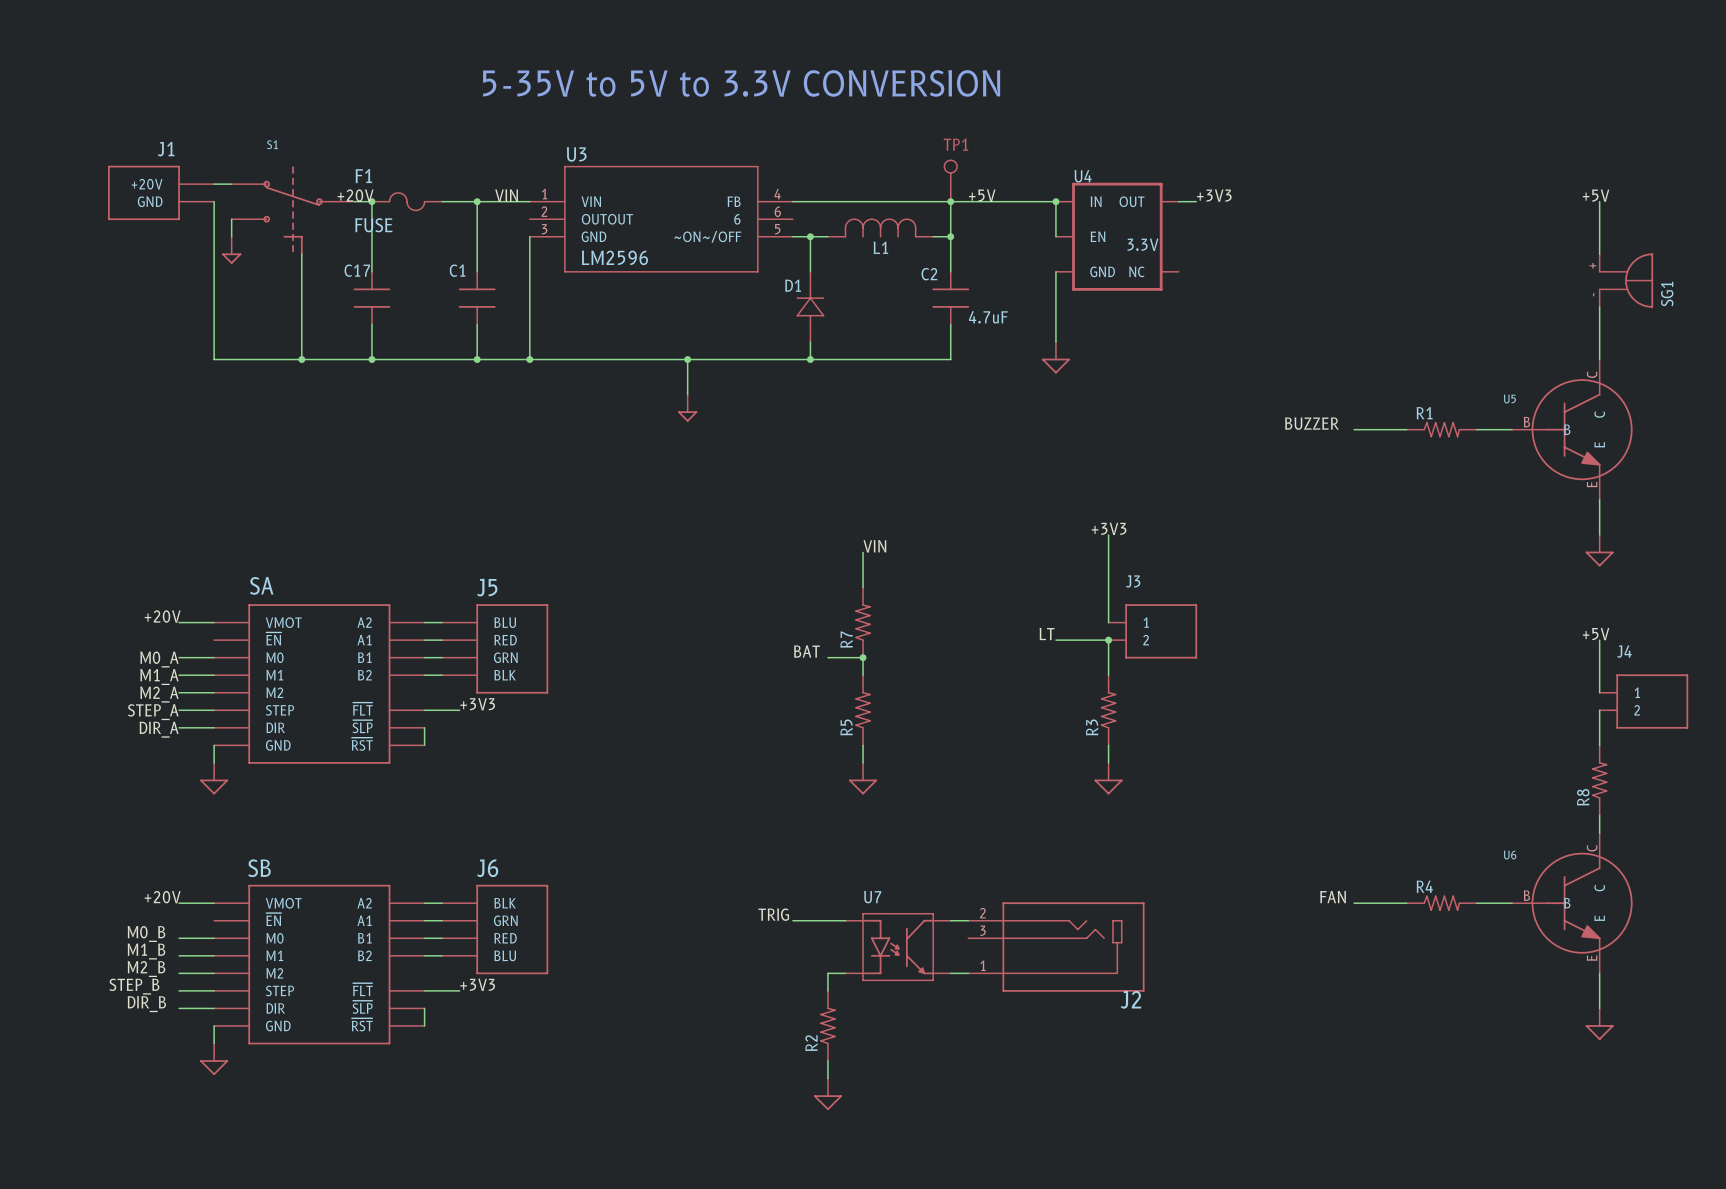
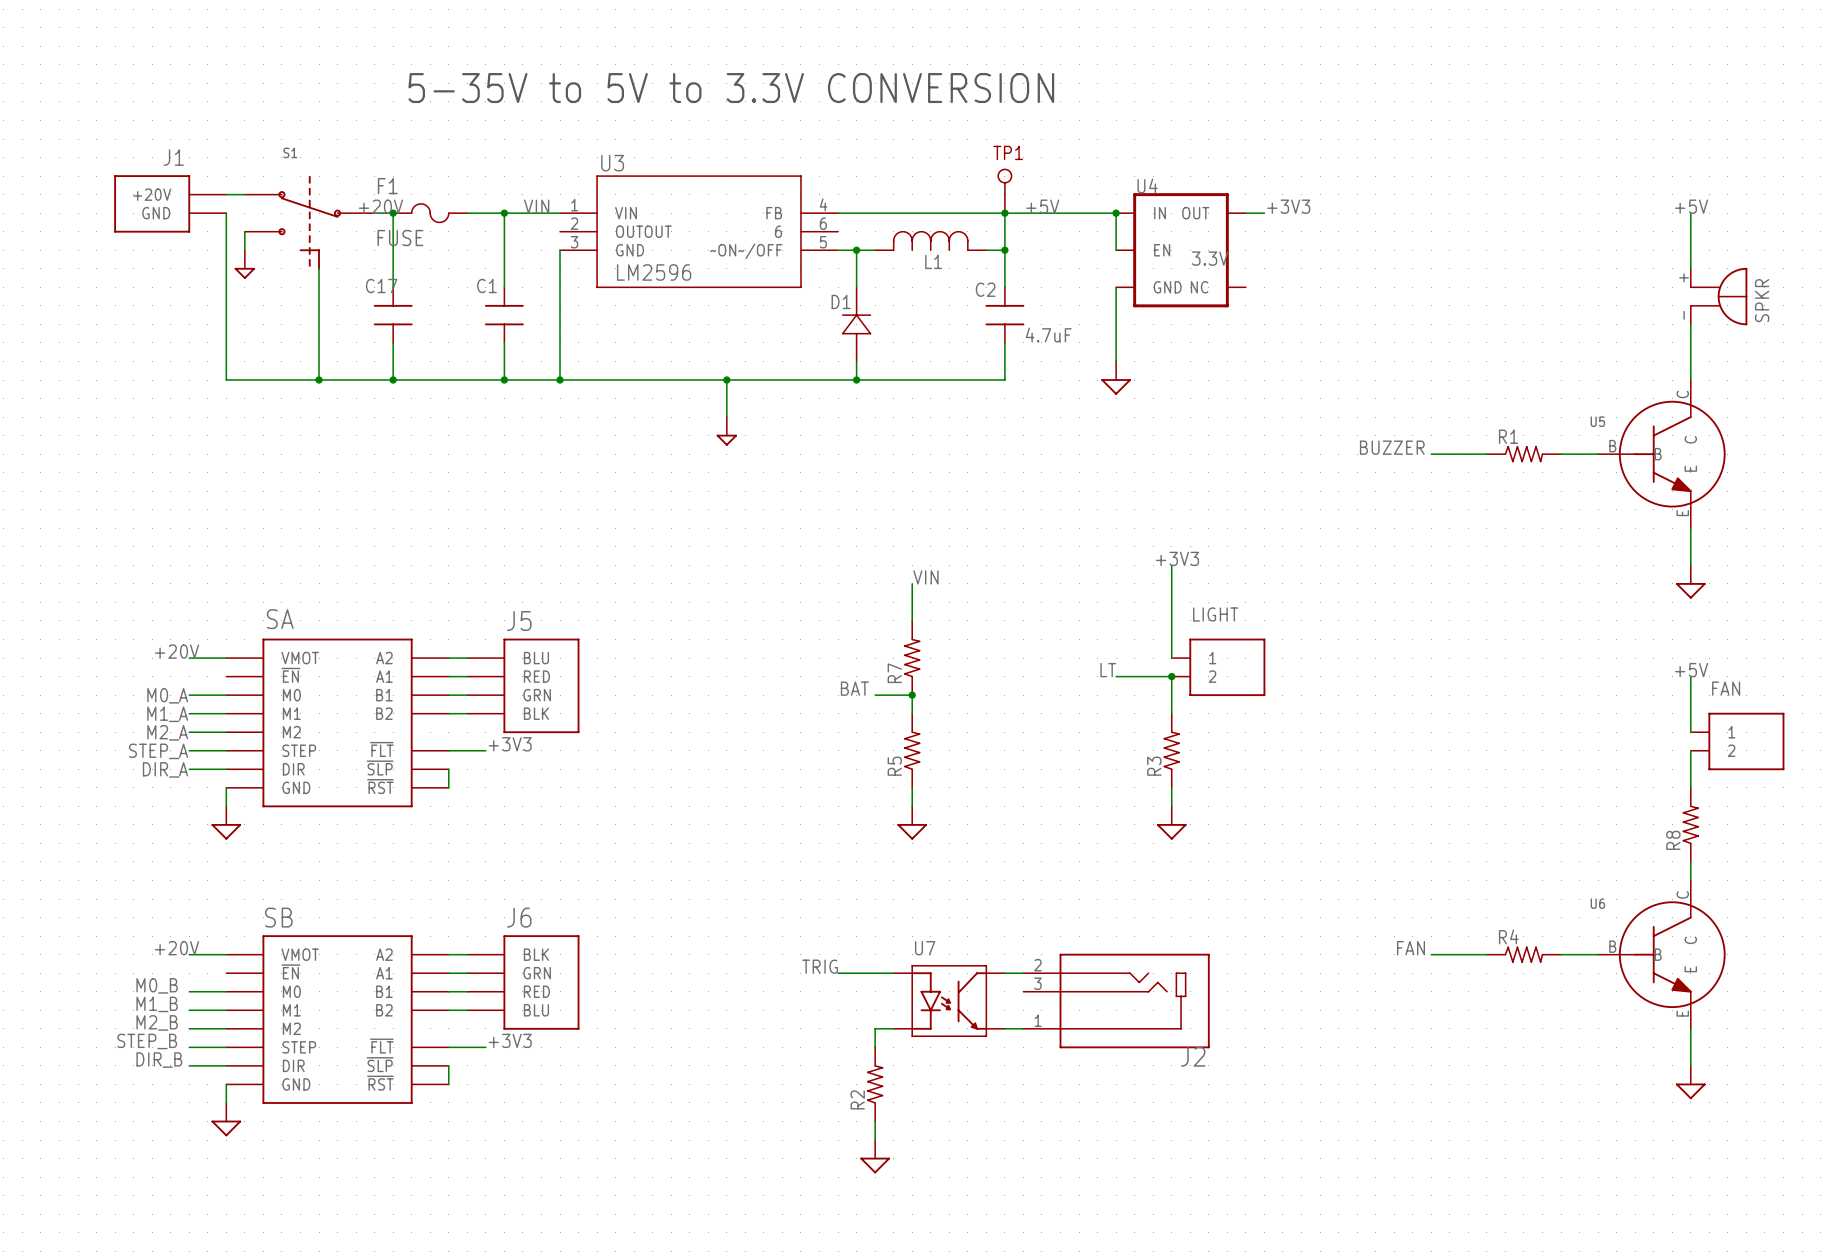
SG1 name: SG1 (1667, 294) -> SPKR (1762, 300)
J3 name: J3 (1133, 581) -> LIGHT (1215, 614)
J4 name: J4 (1624, 651) -> FAN (1726, 688)

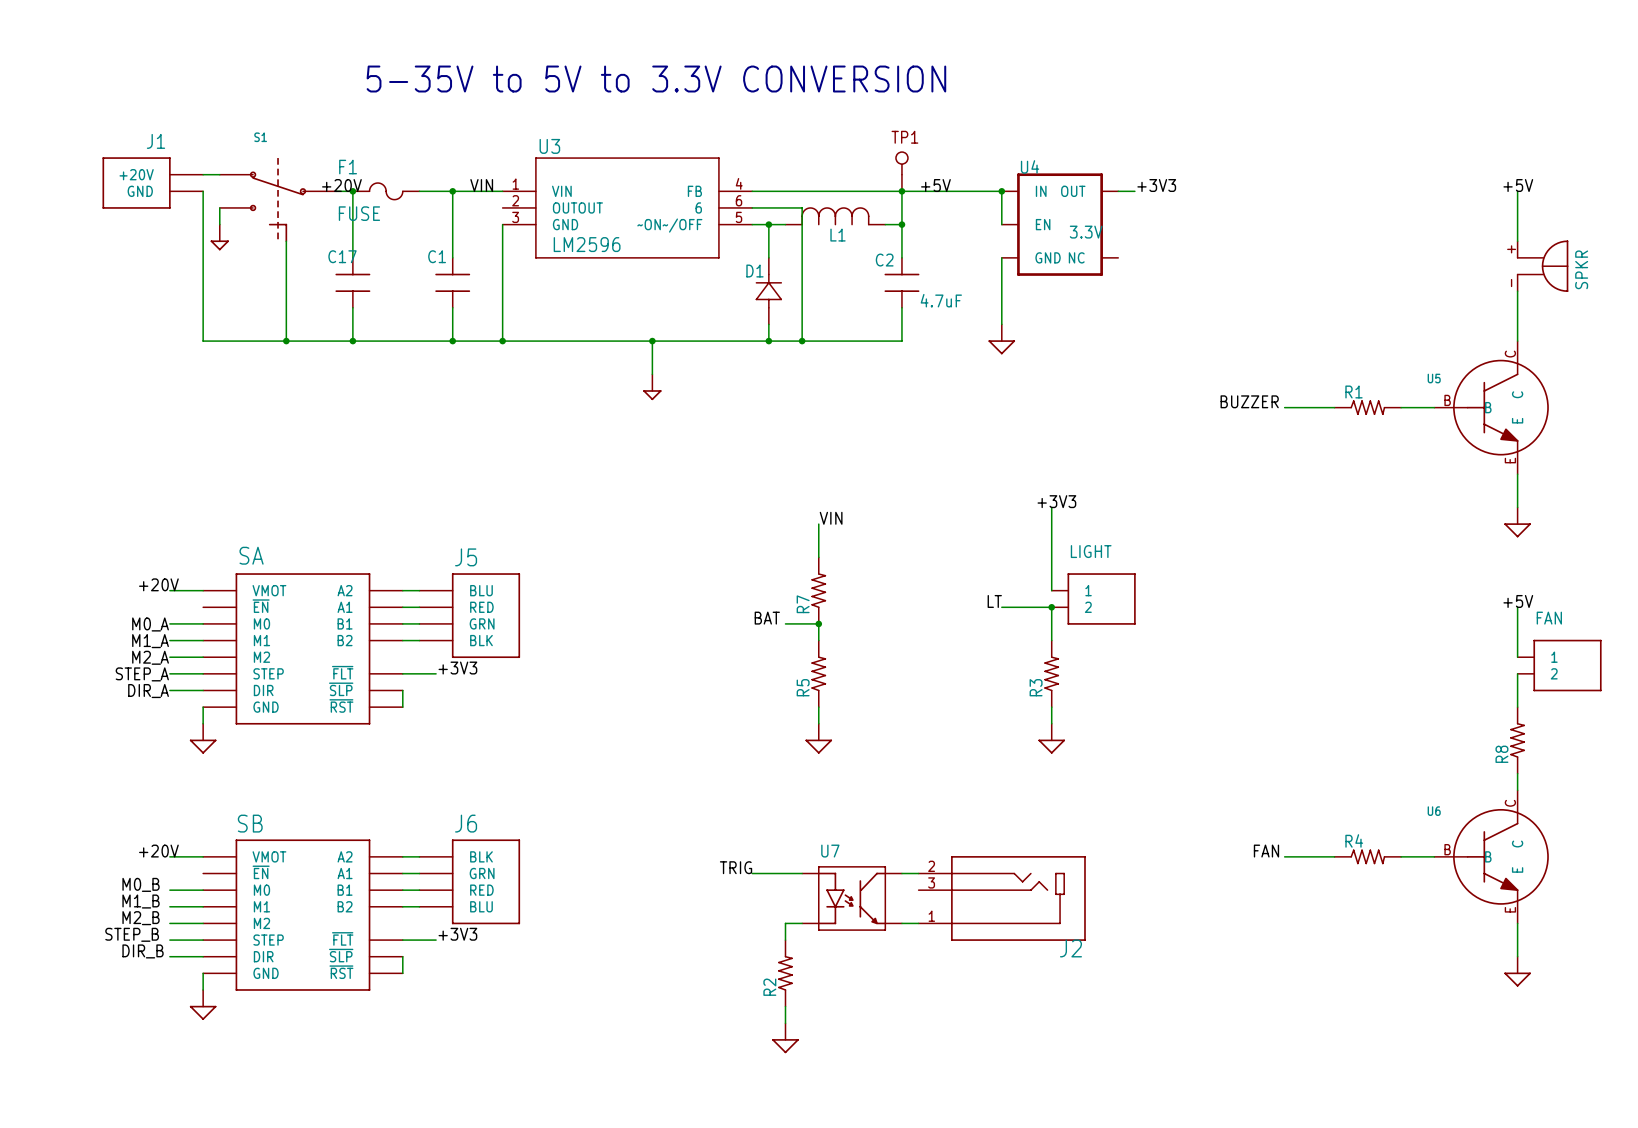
wire: none -> (752, 207) (802, 207) (802, 341)
junction: none -> (802, 341)

